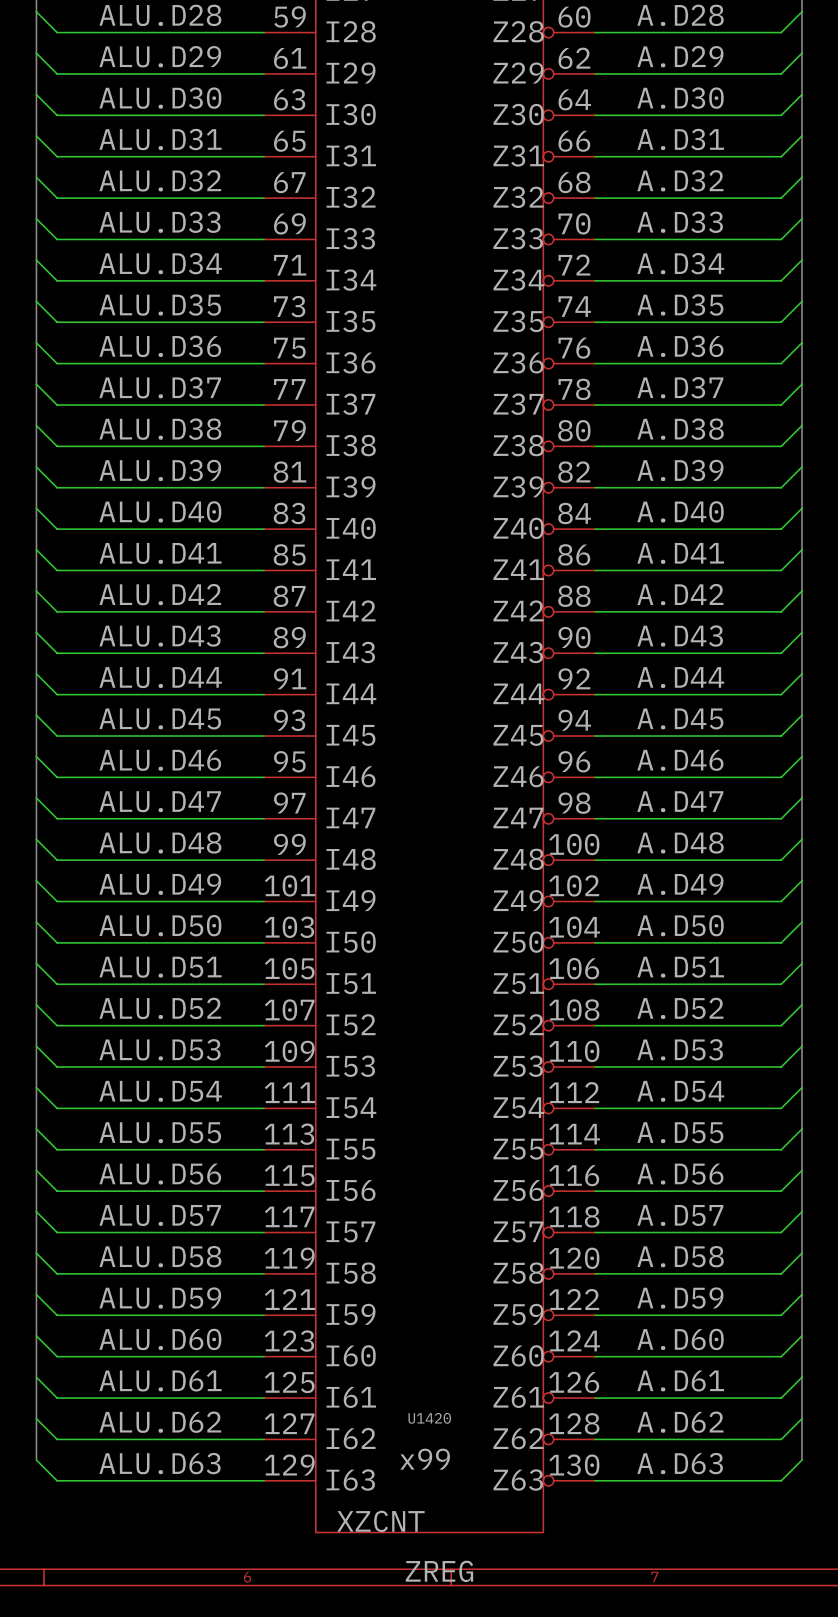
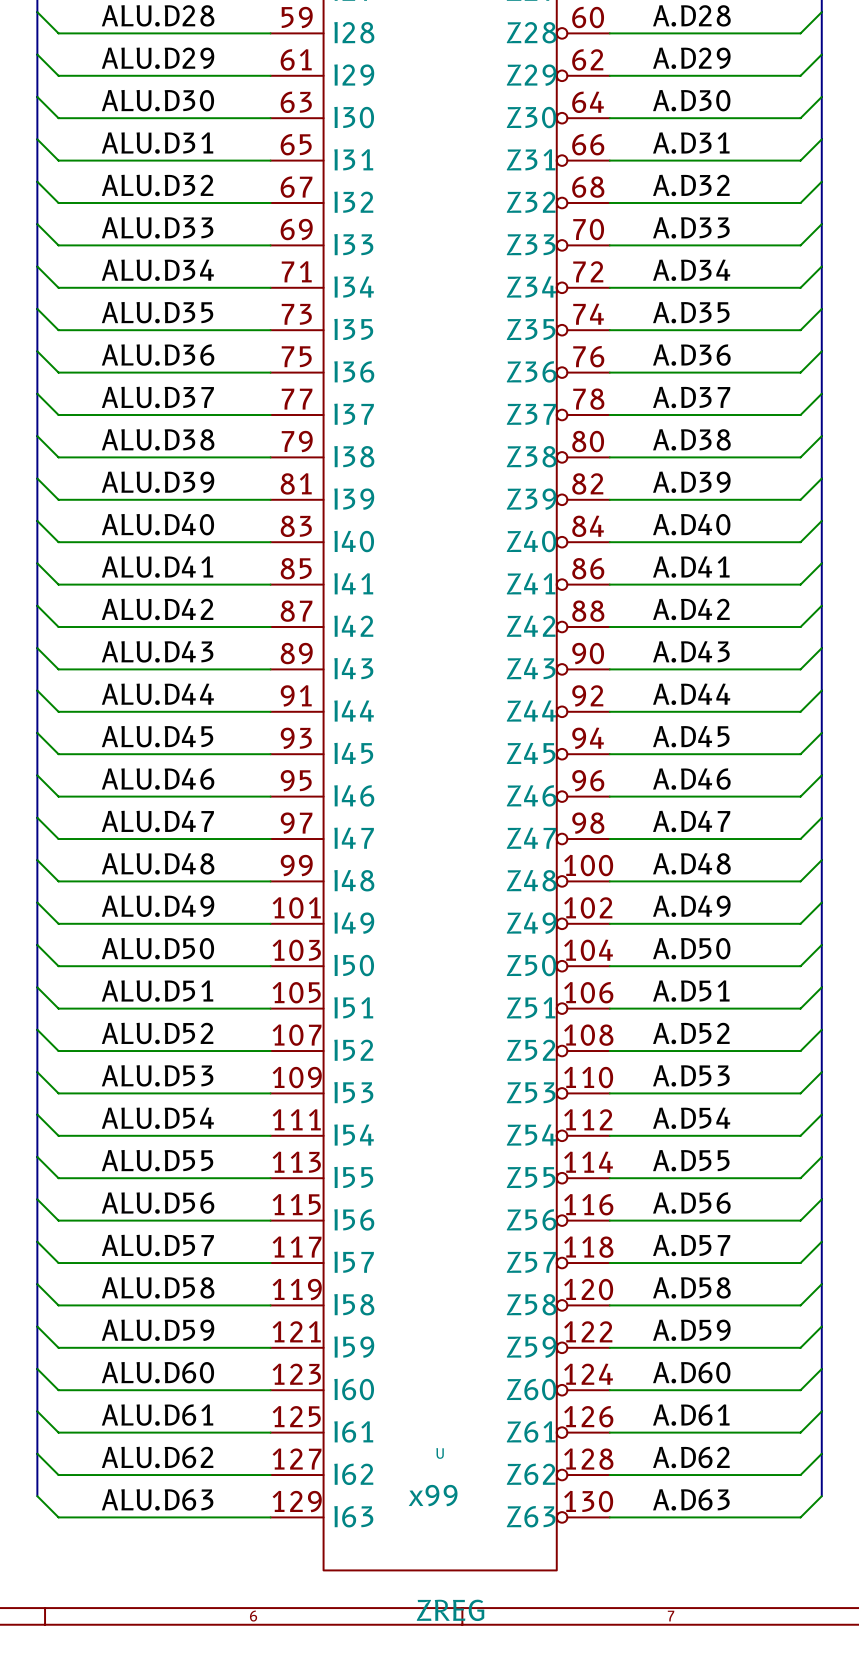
U1420 name: U1420 (429, 1418) -> U (440, 1453)
U1420 value: XZCNT (380, 1521) -> none

